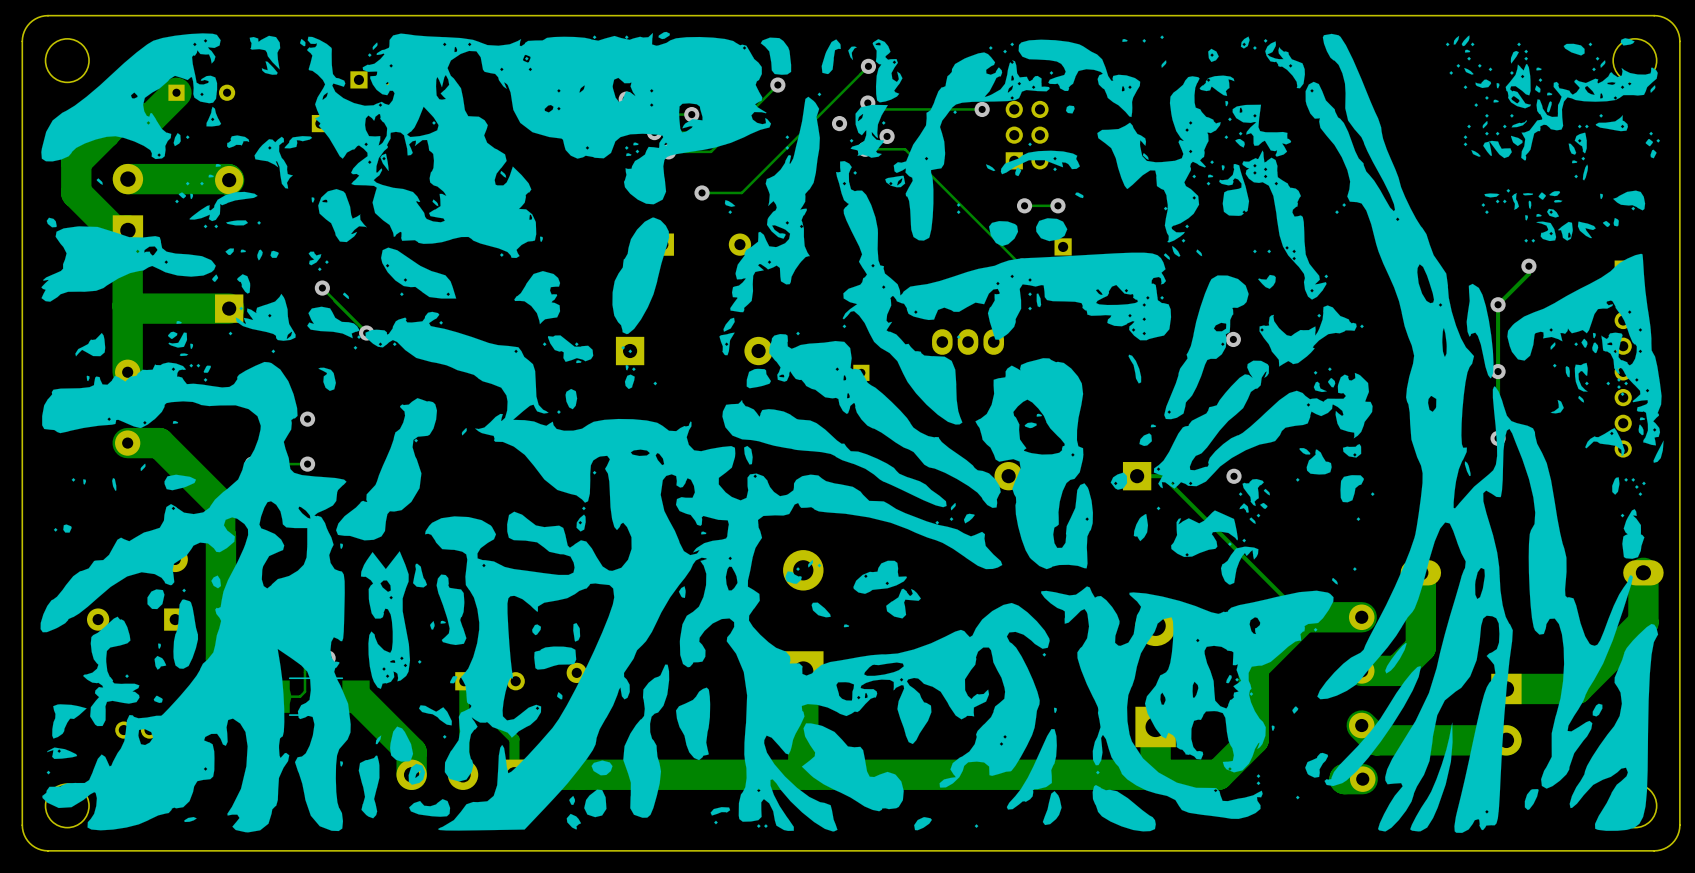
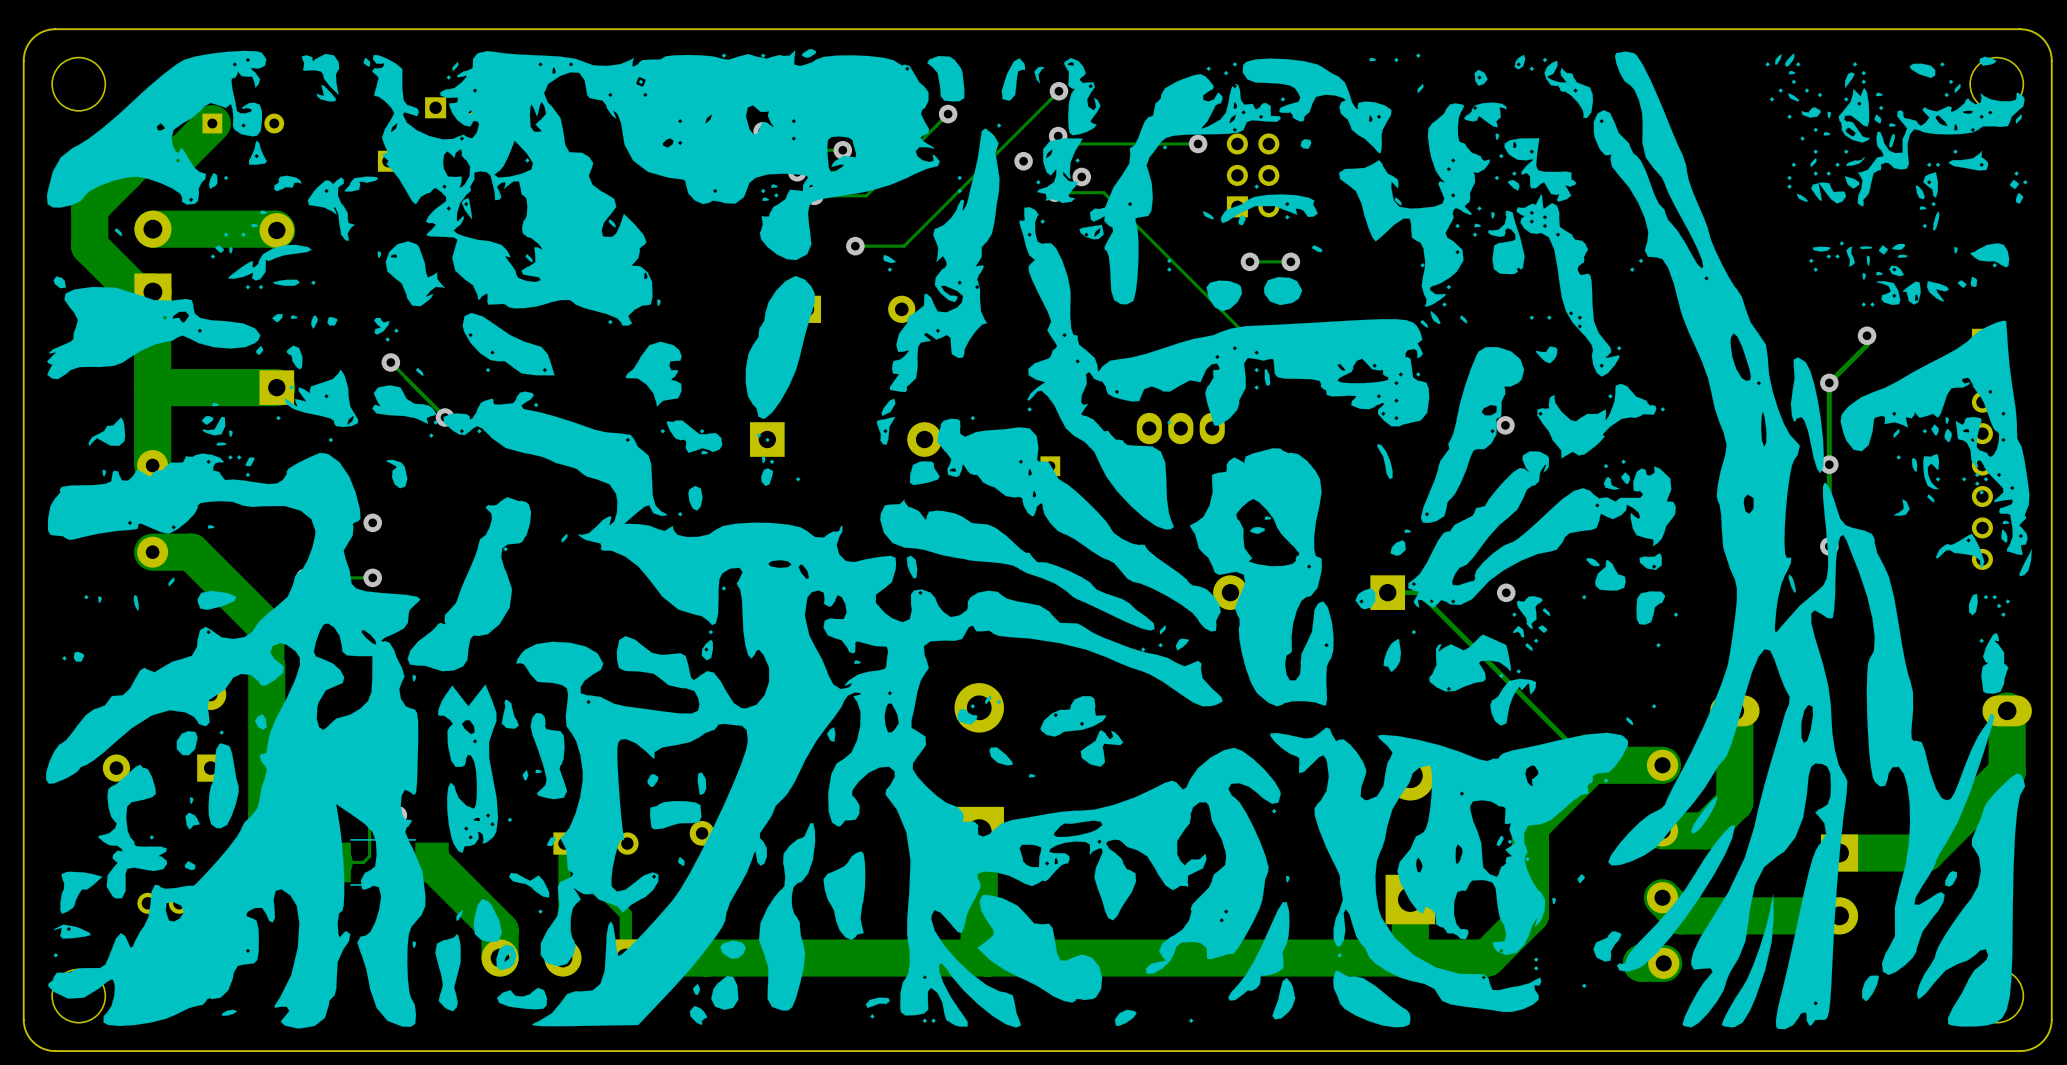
part: (1063, 246) -> none

